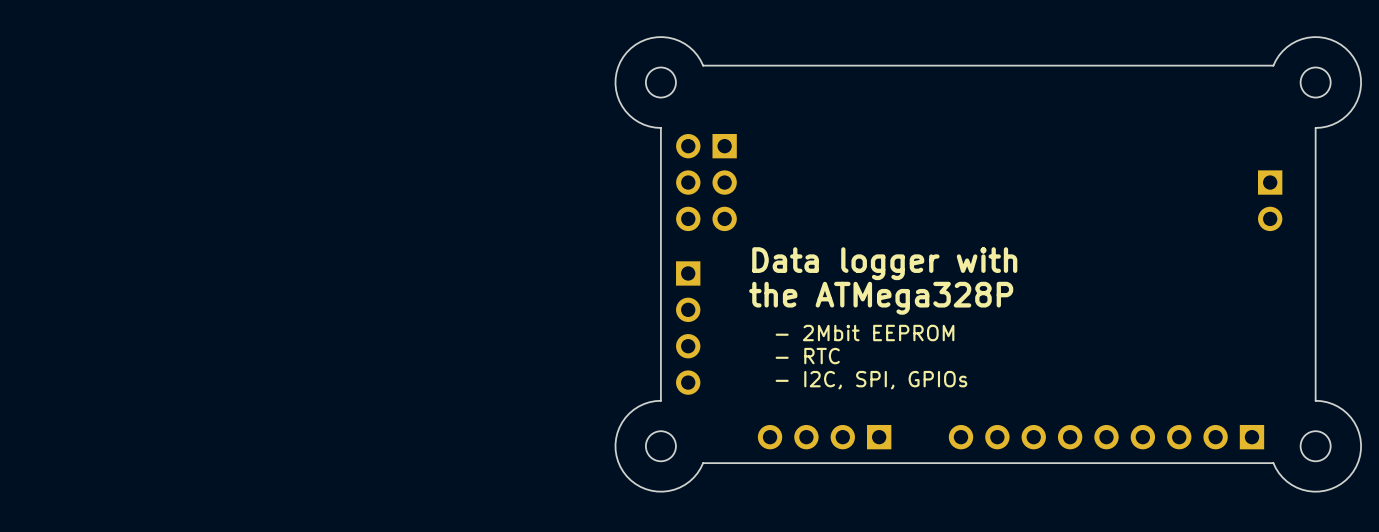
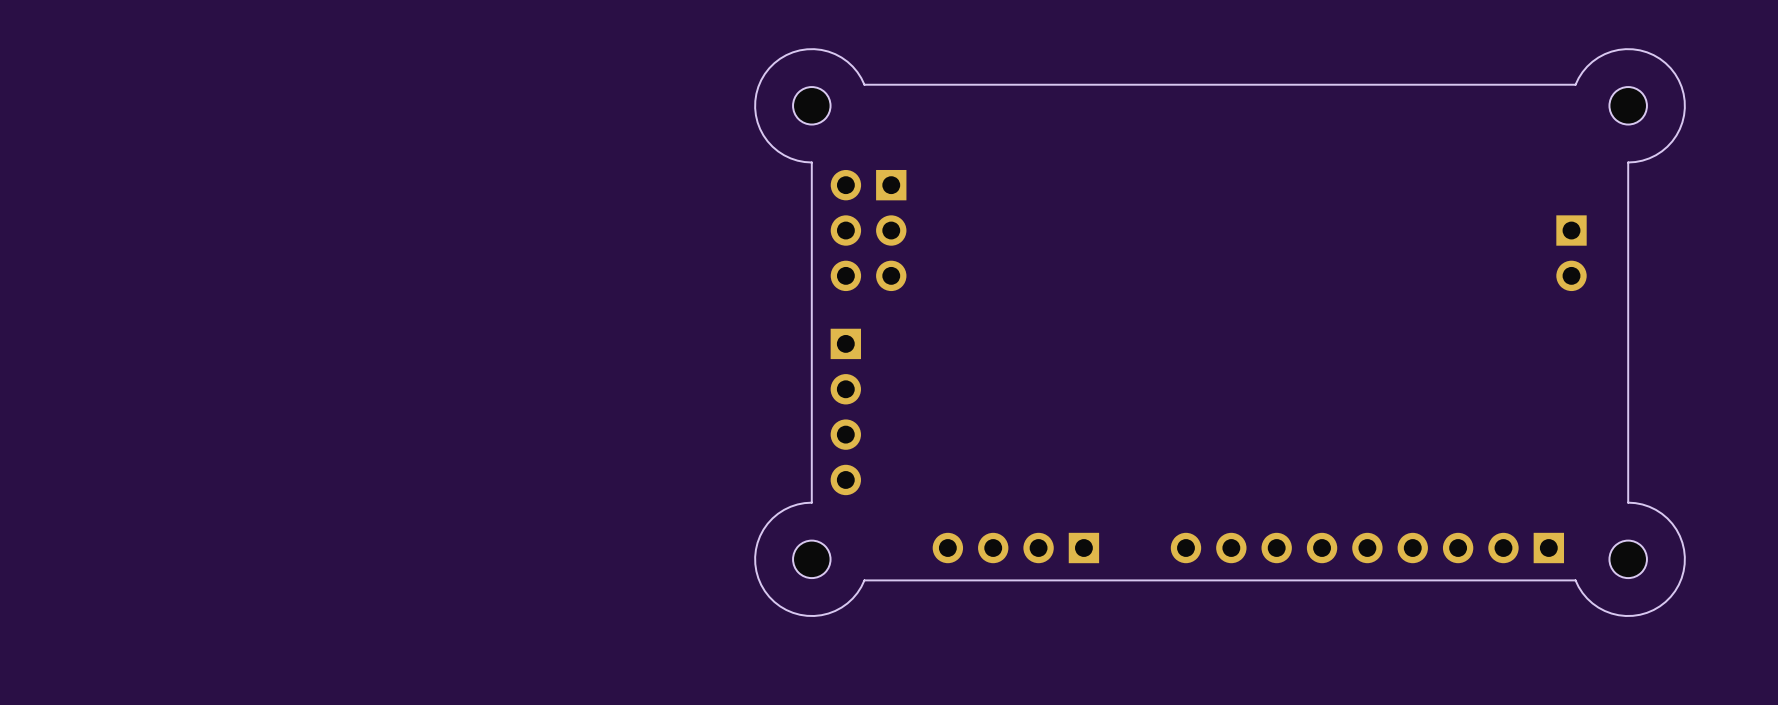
text: Data logger with (884, 263) -> none
text: the ATMega328P (881, 298) -> none
text: - 2Mbit EEPROM (864, 333) -> none
text: - RTC (807, 356) -> none
text: - I2C, SPI, GPIOs (871, 380) -> none

